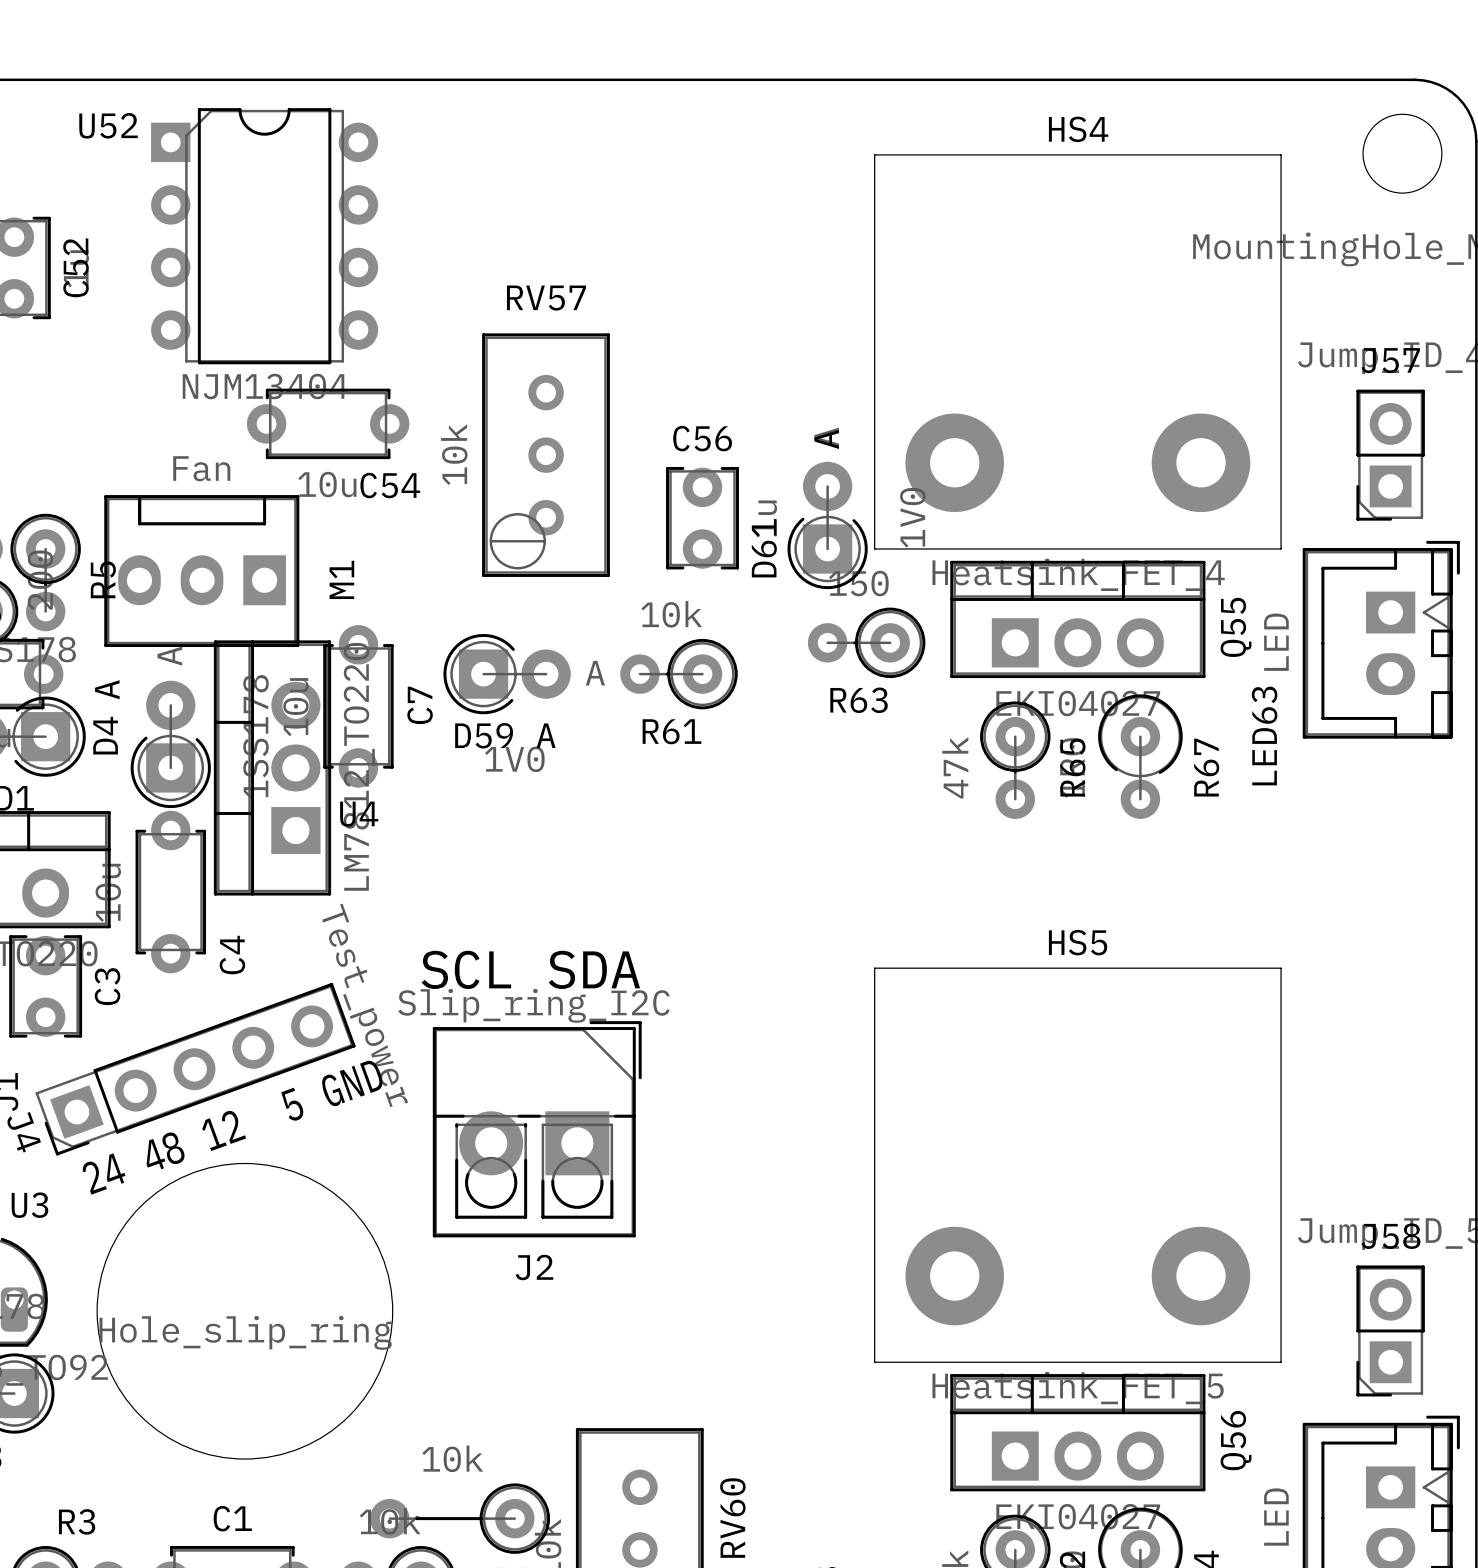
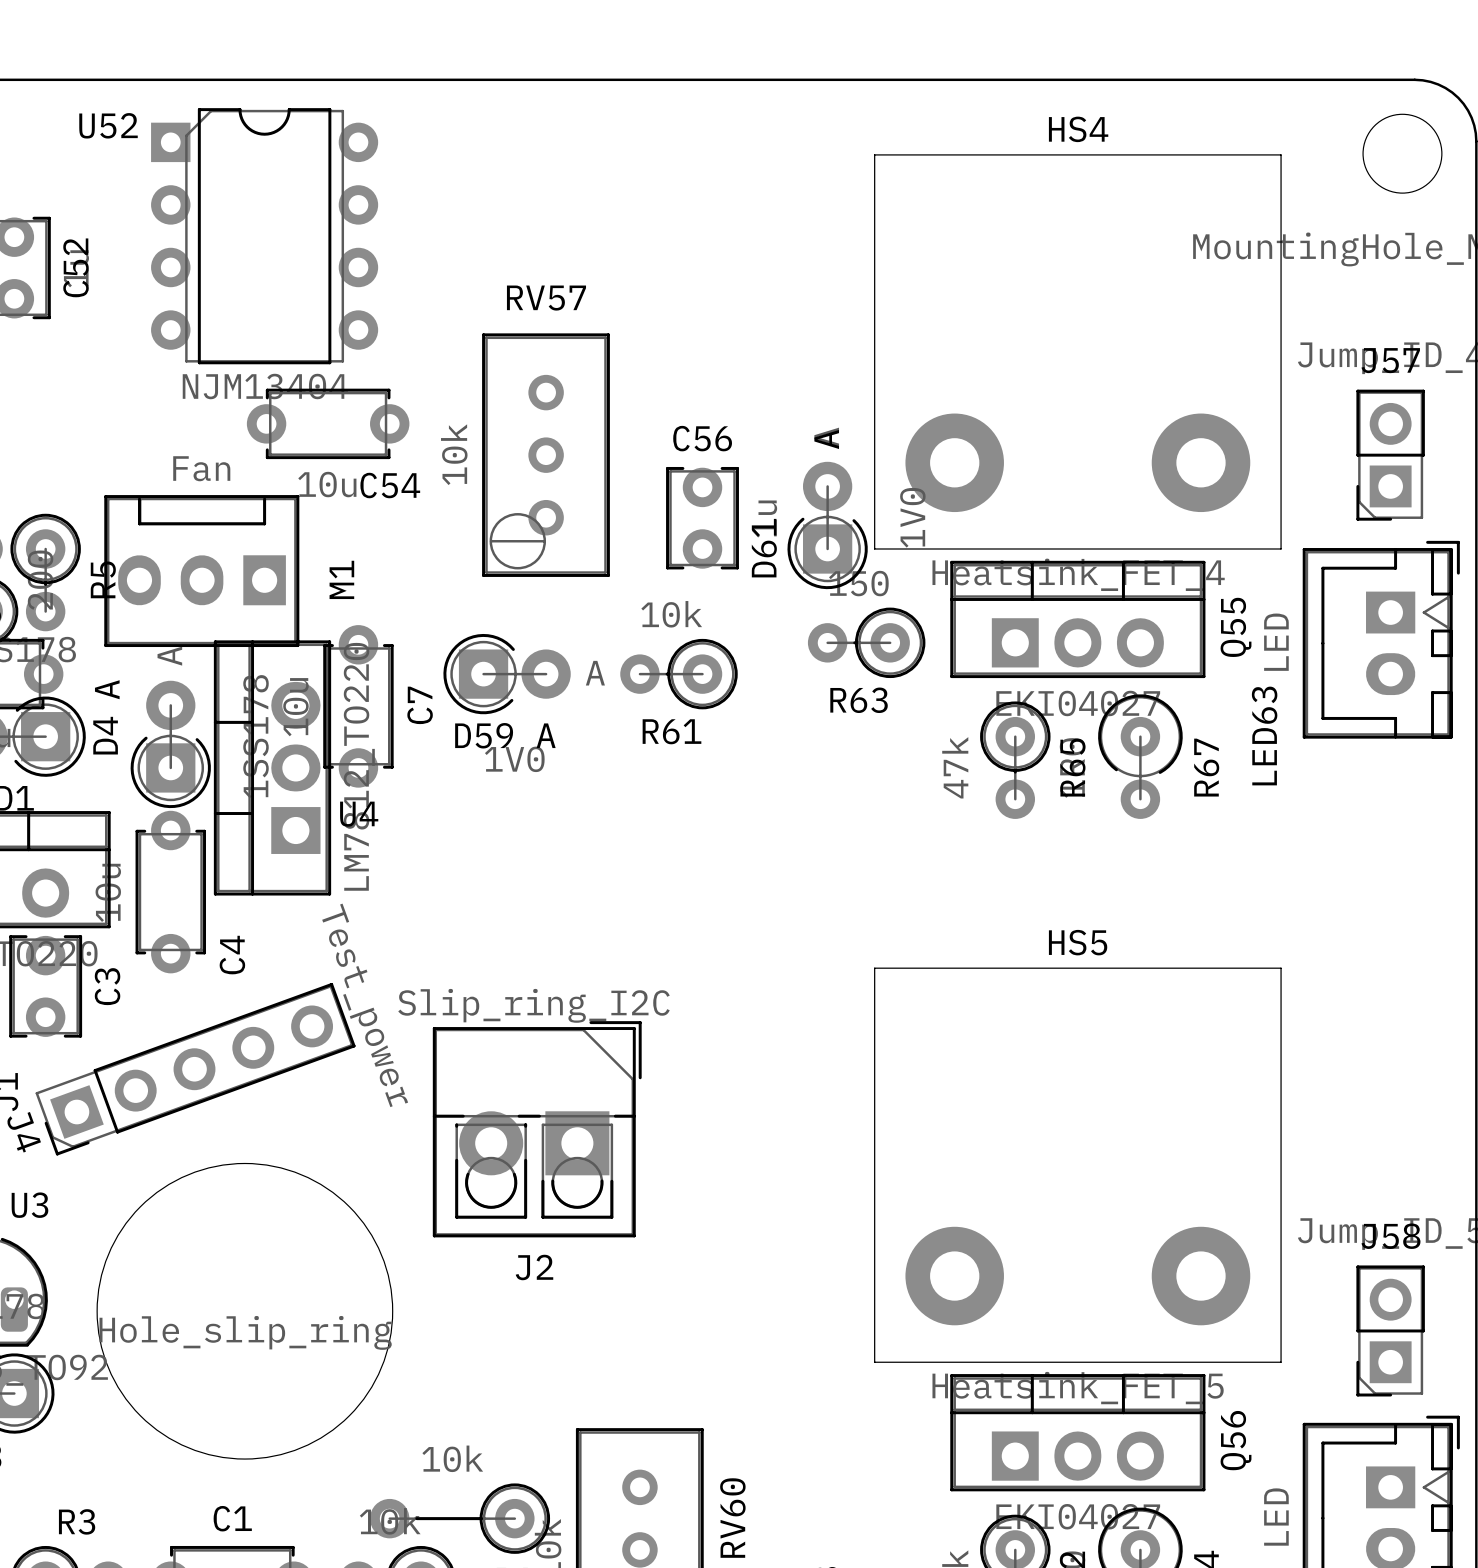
text: SCL SDA (530, 969) -> none
text: 24 48 12 5 GND (232, 1127) -> none

